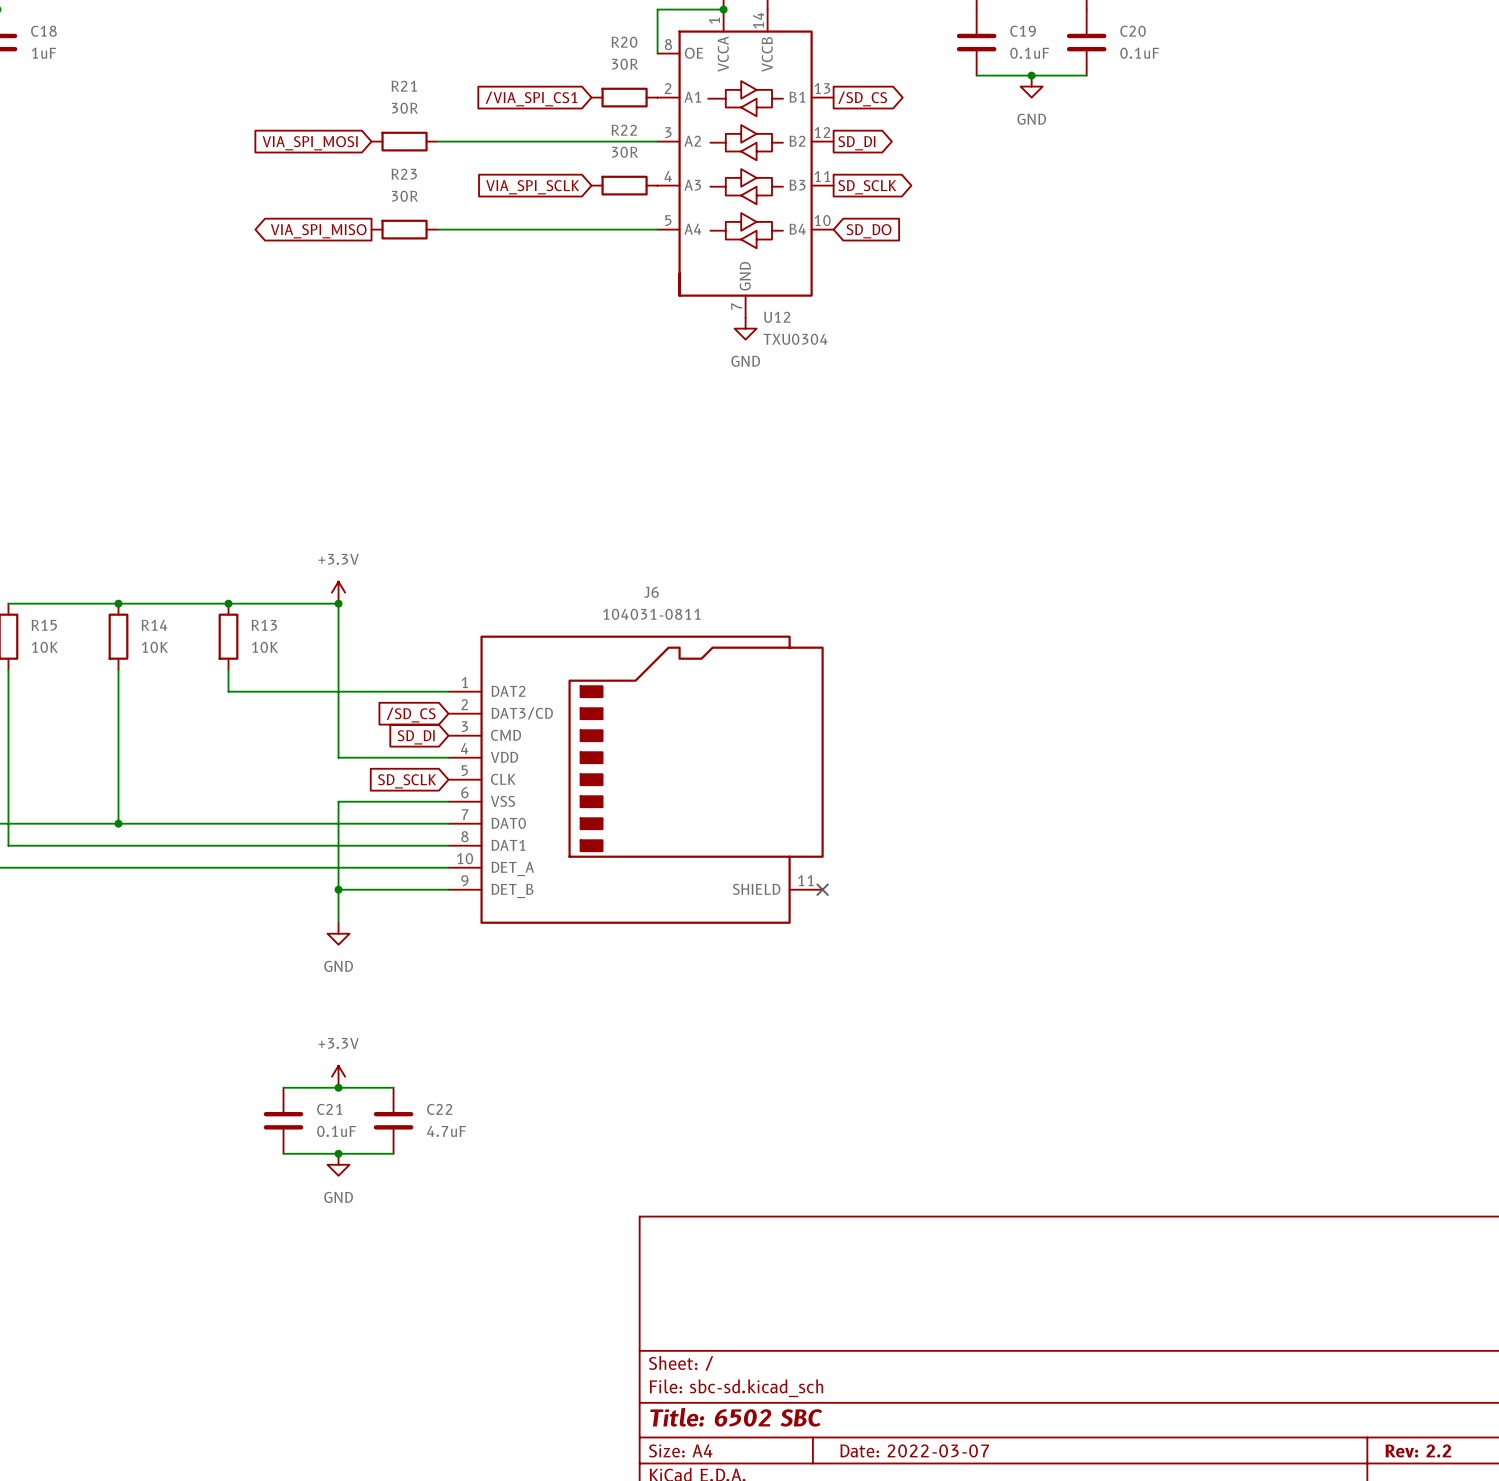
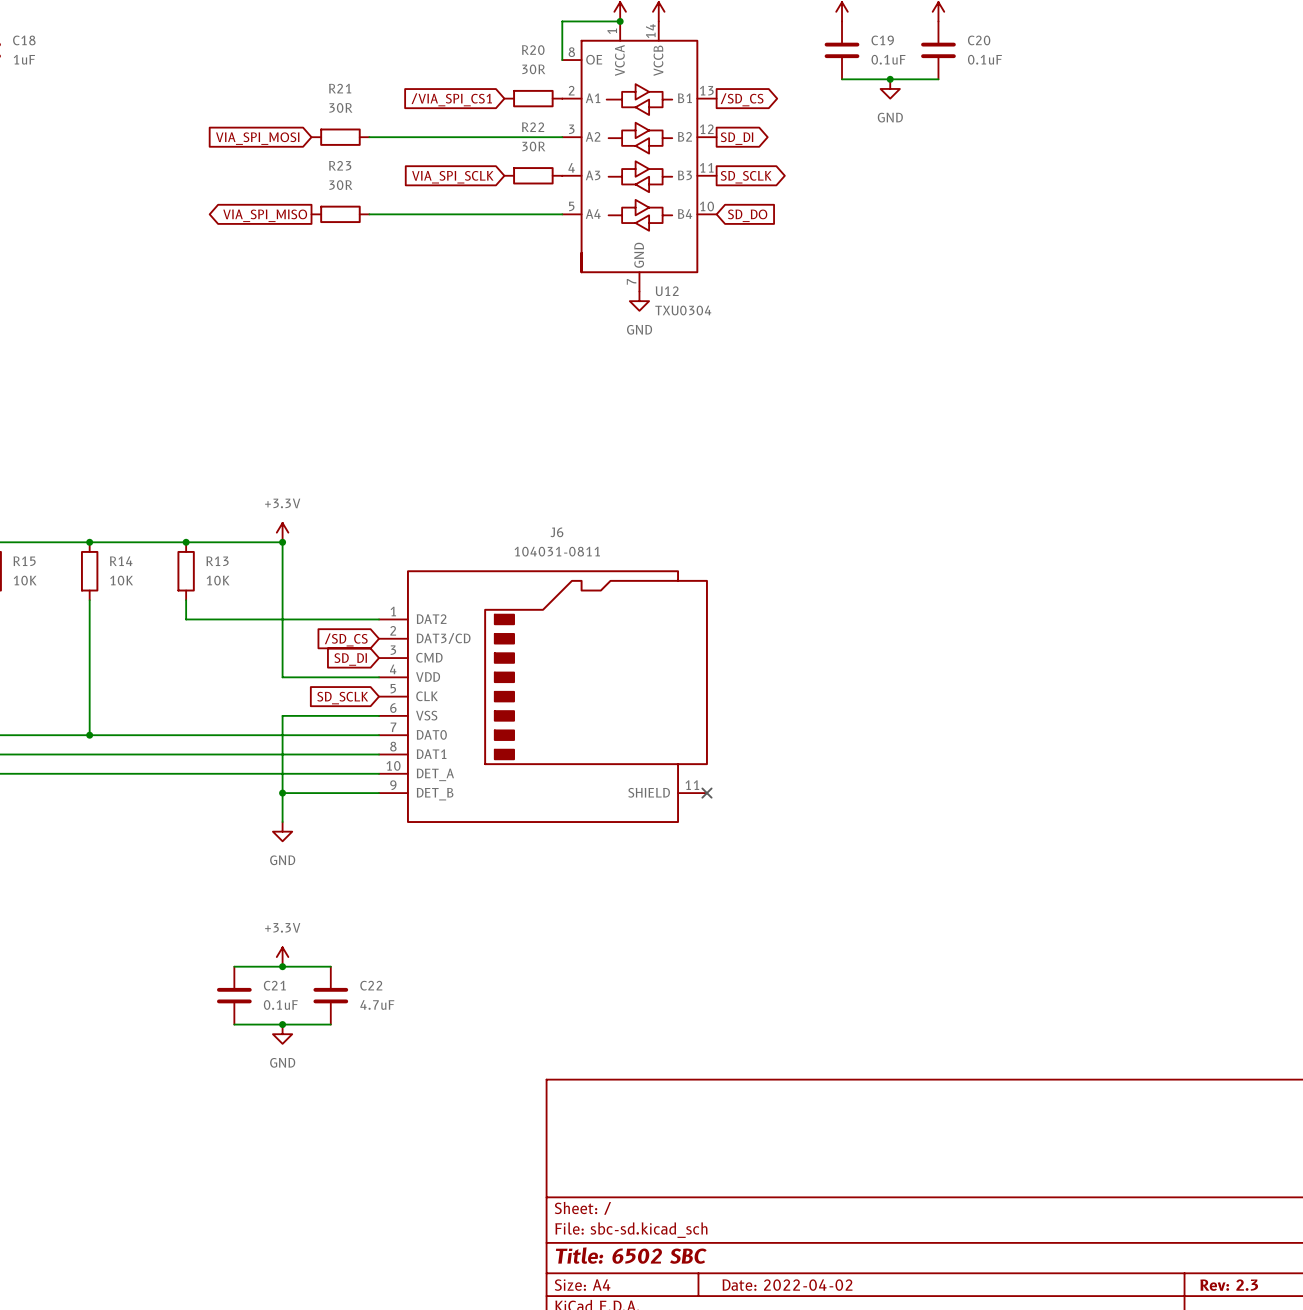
title block: Date: 2022-03-07 (914, 1450) -> Date: 2022-04-02 (787, 1285)
title block: Rev: 2.2 (1418, 1451) -> Rev: 2.3 (1229, 1285)

